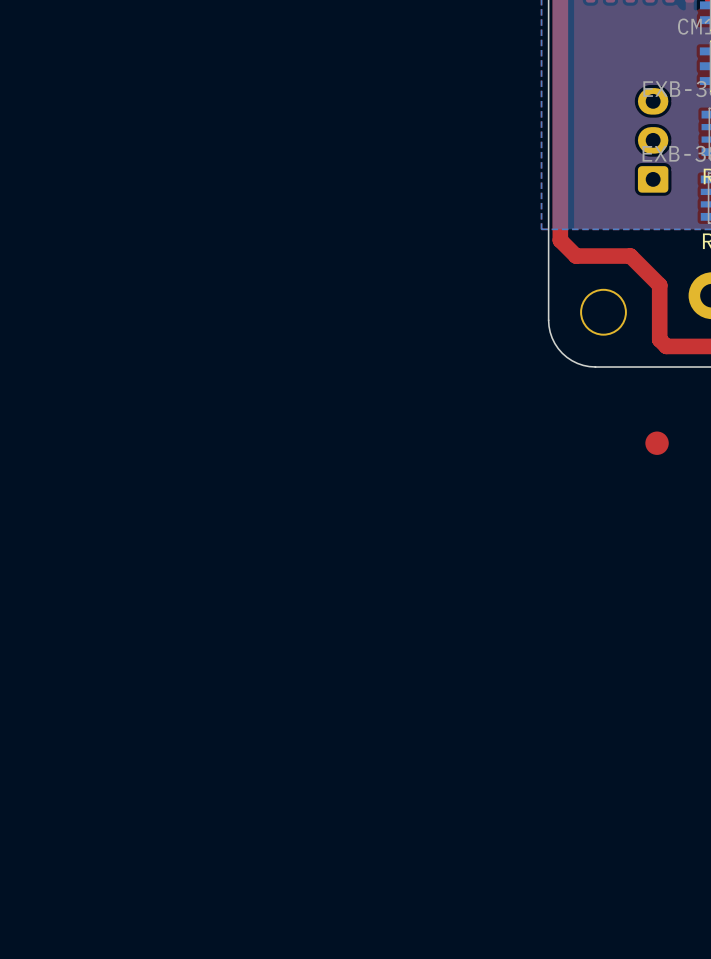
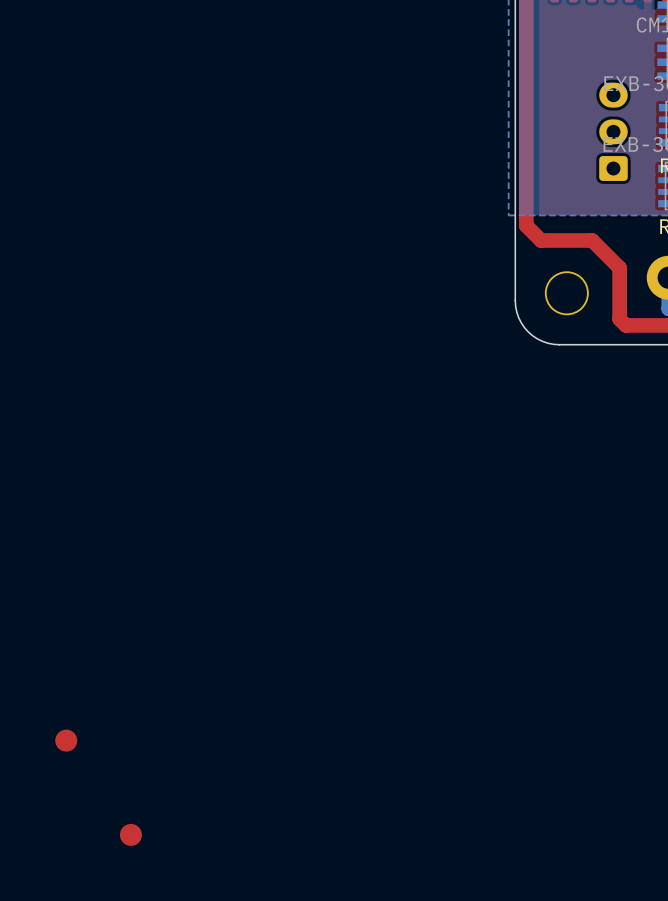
part: (657, 443) -> none
part: none -> (66, 740)
part: none -> (130, 834)

